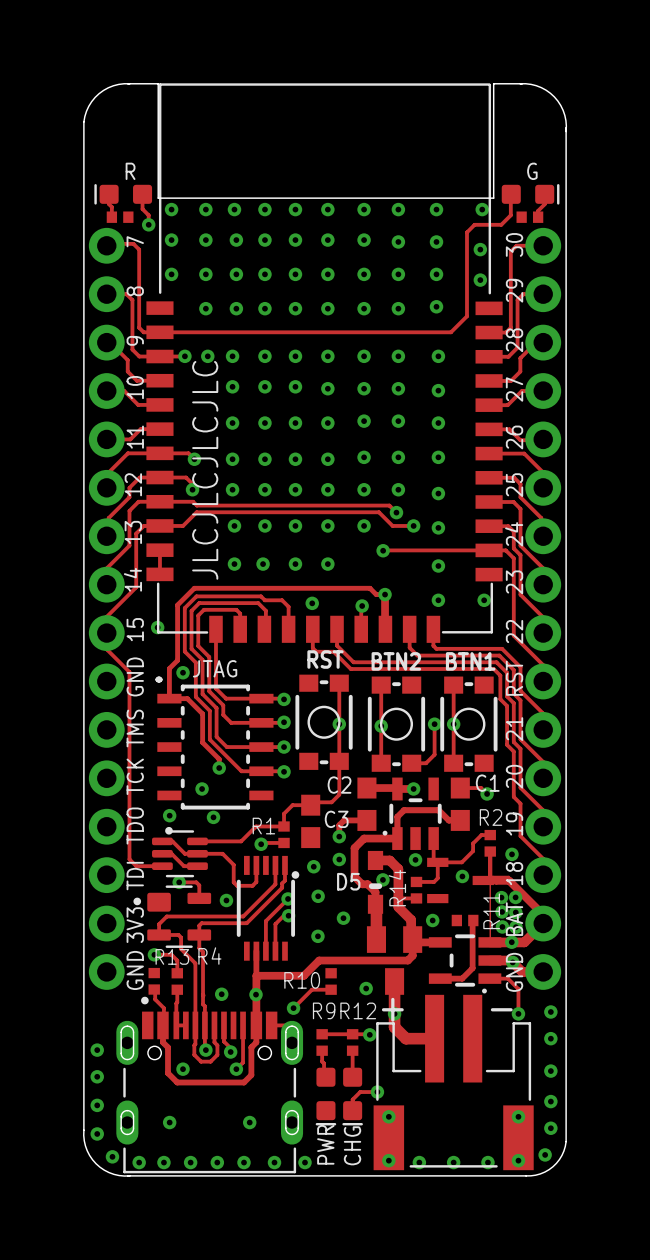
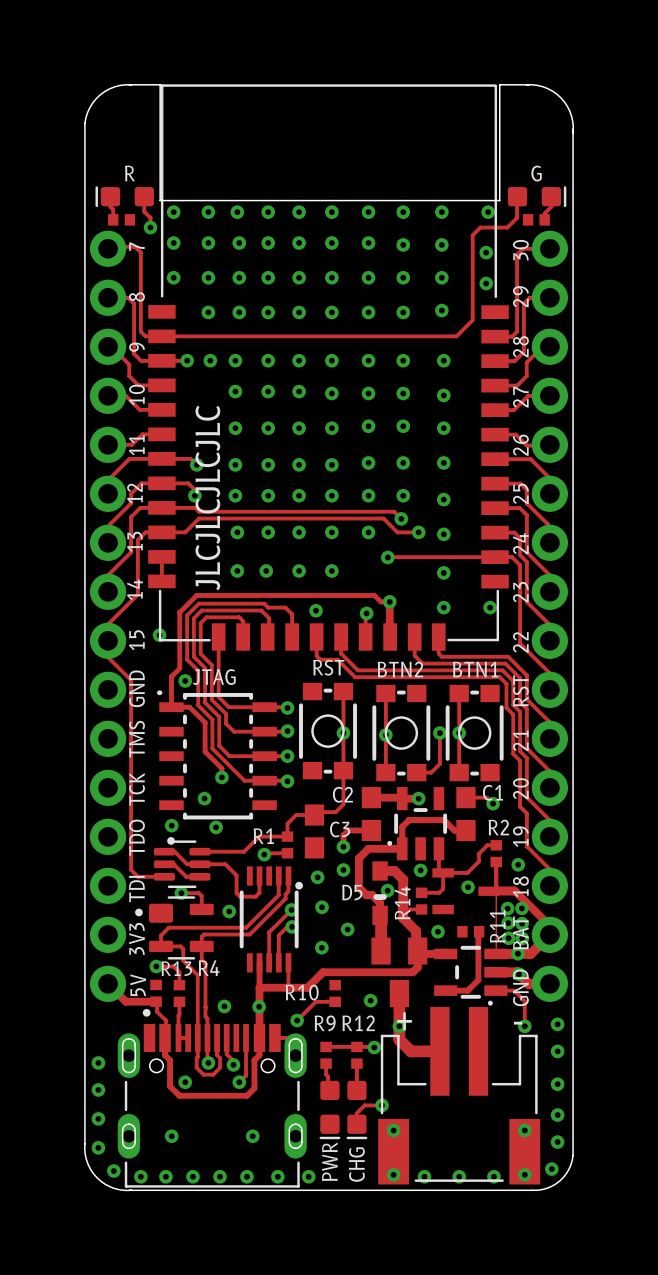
track: none -> (288, 962) (287, 987)
text: GND (135, 970) -> 5V (138, 985)
track: none -> (108, 983) (125, 1001) (156, 1001)

